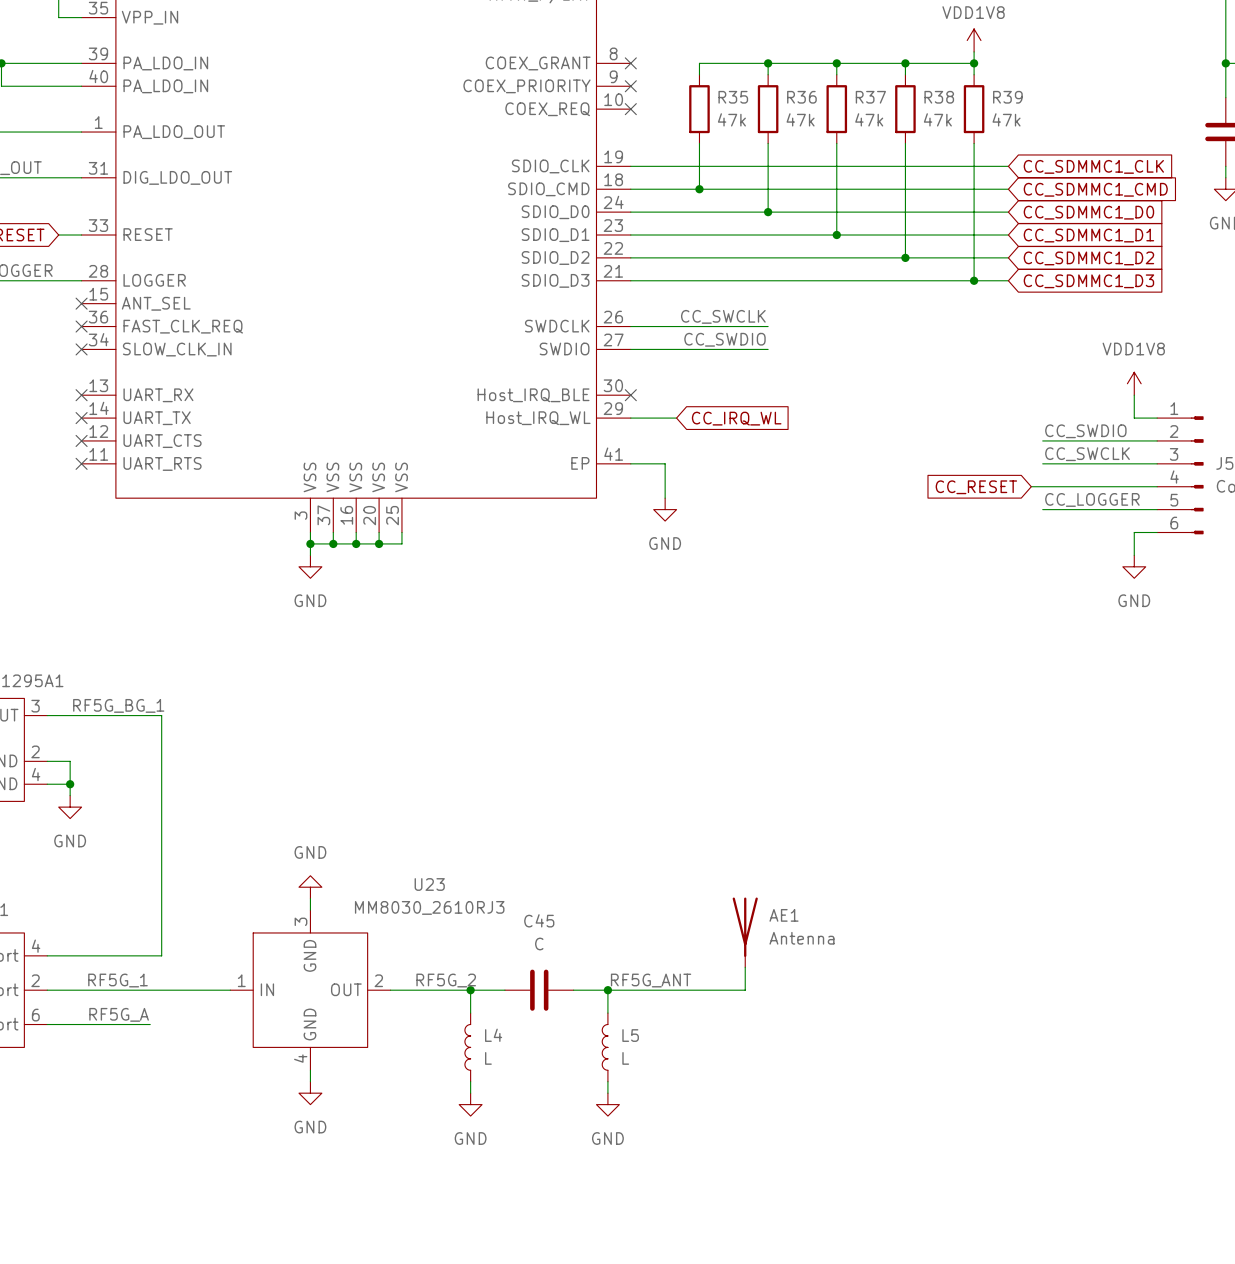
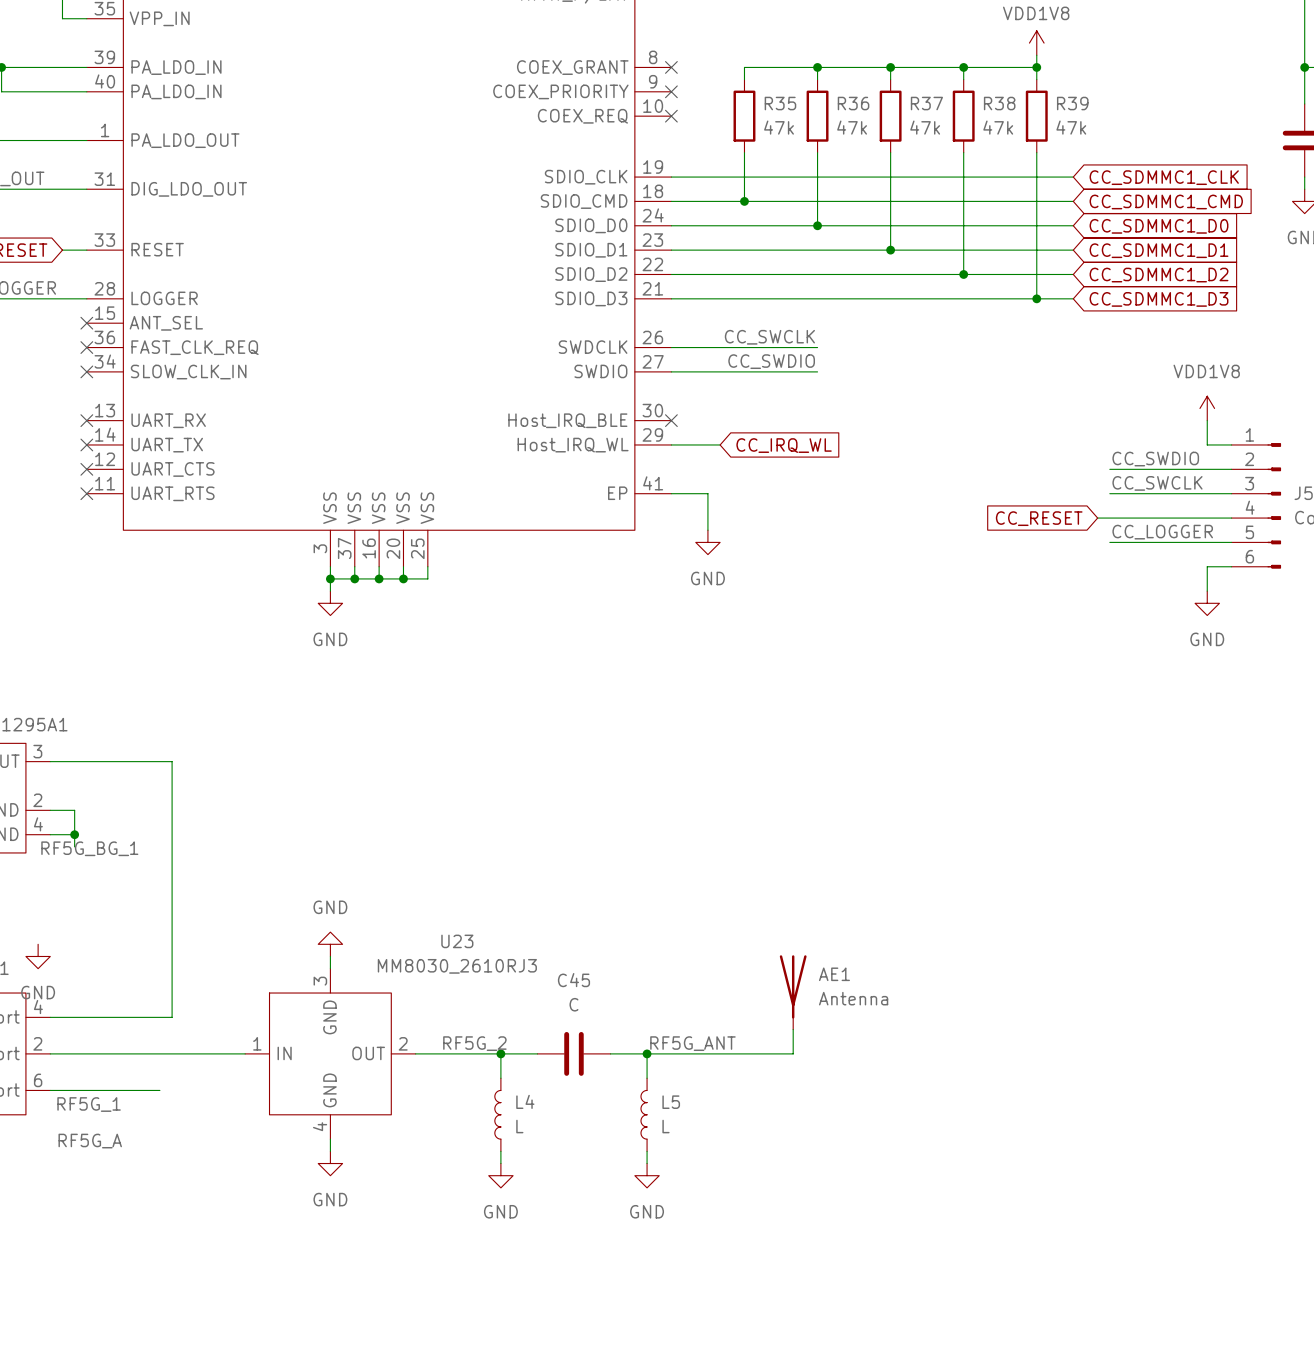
label position: RF5G_BG_1 (118, 705) -> RF5G_BG_1 (89, 848)
power symbol position: GND (70, 807) -> GND (38, 956)
label position: RF5G_1 (118, 980) -> RF5G_1 (89, 1104)
label position: RF5G_A (119, 1014) -> RF5G_A (90, 1141)

